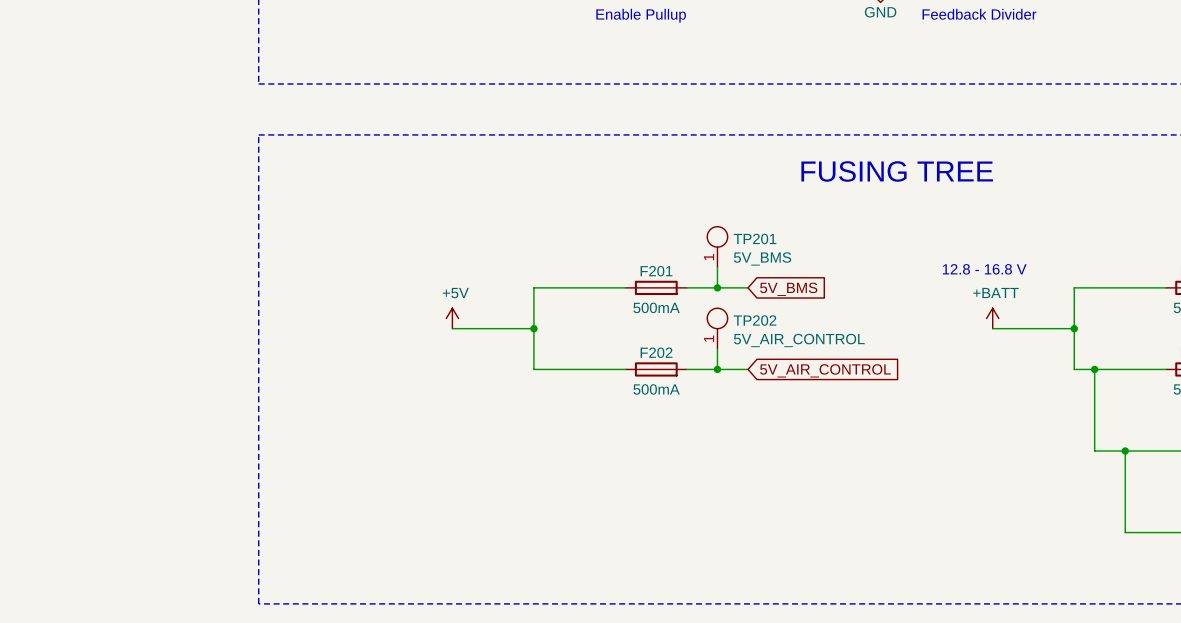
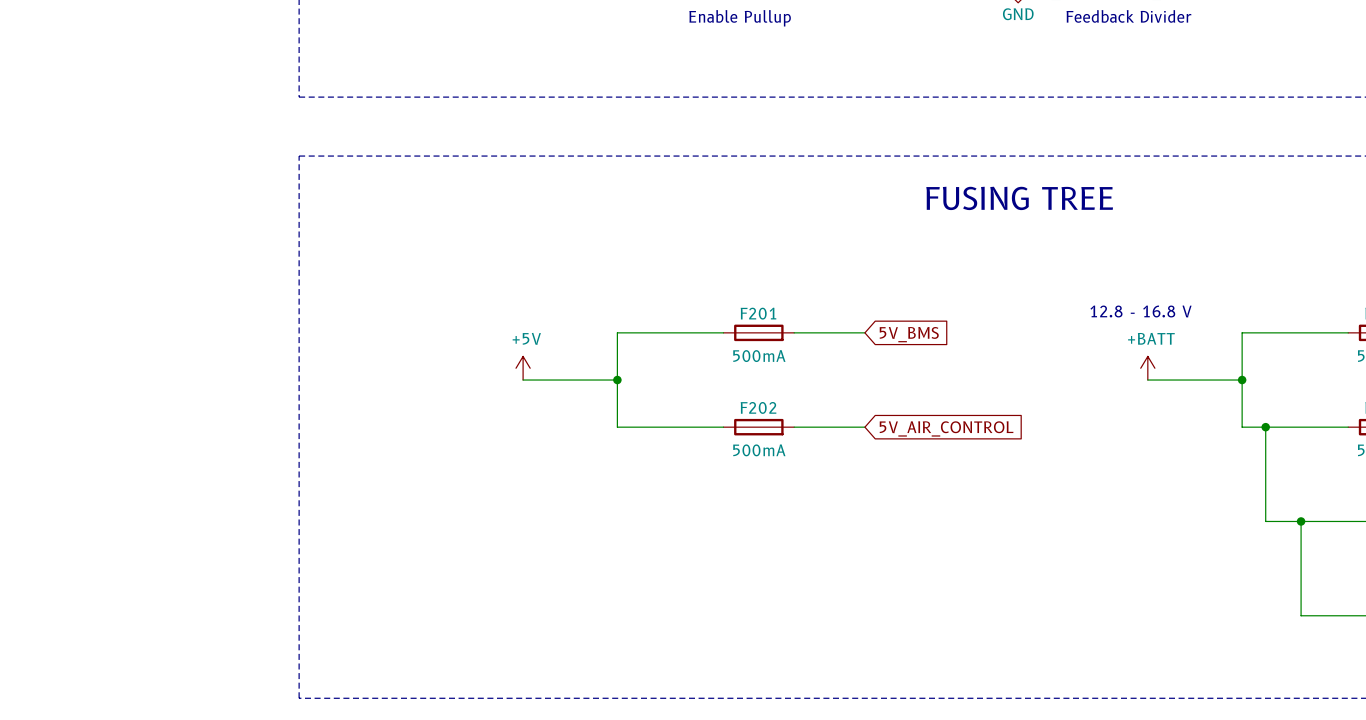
TP201: 5V_BMS (717, 247) -> none
wire: (717, 267) (717, 287) -> none
junction: (717, 287) -> none
TP202: 5V_AIR_CONTROL (717, 328) -> none
wire: (717, 349) (717, 369) -> none
junction: (717, 369) -> none

